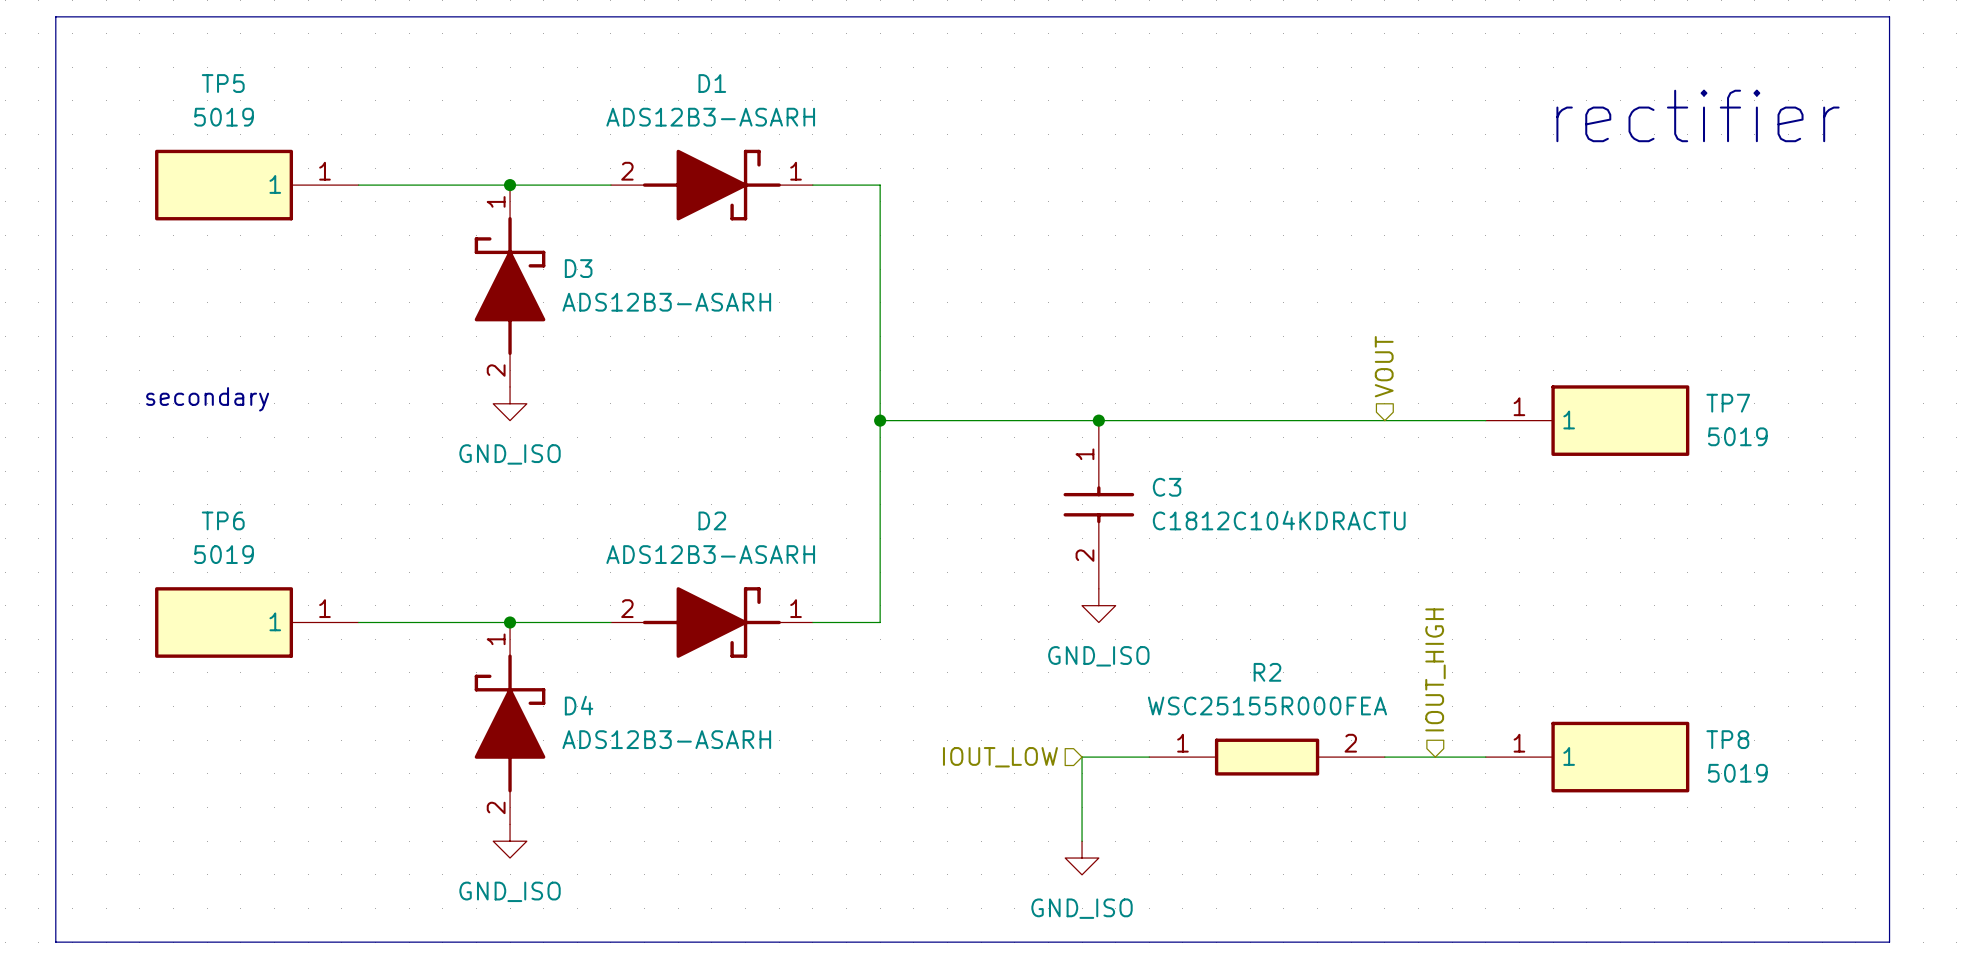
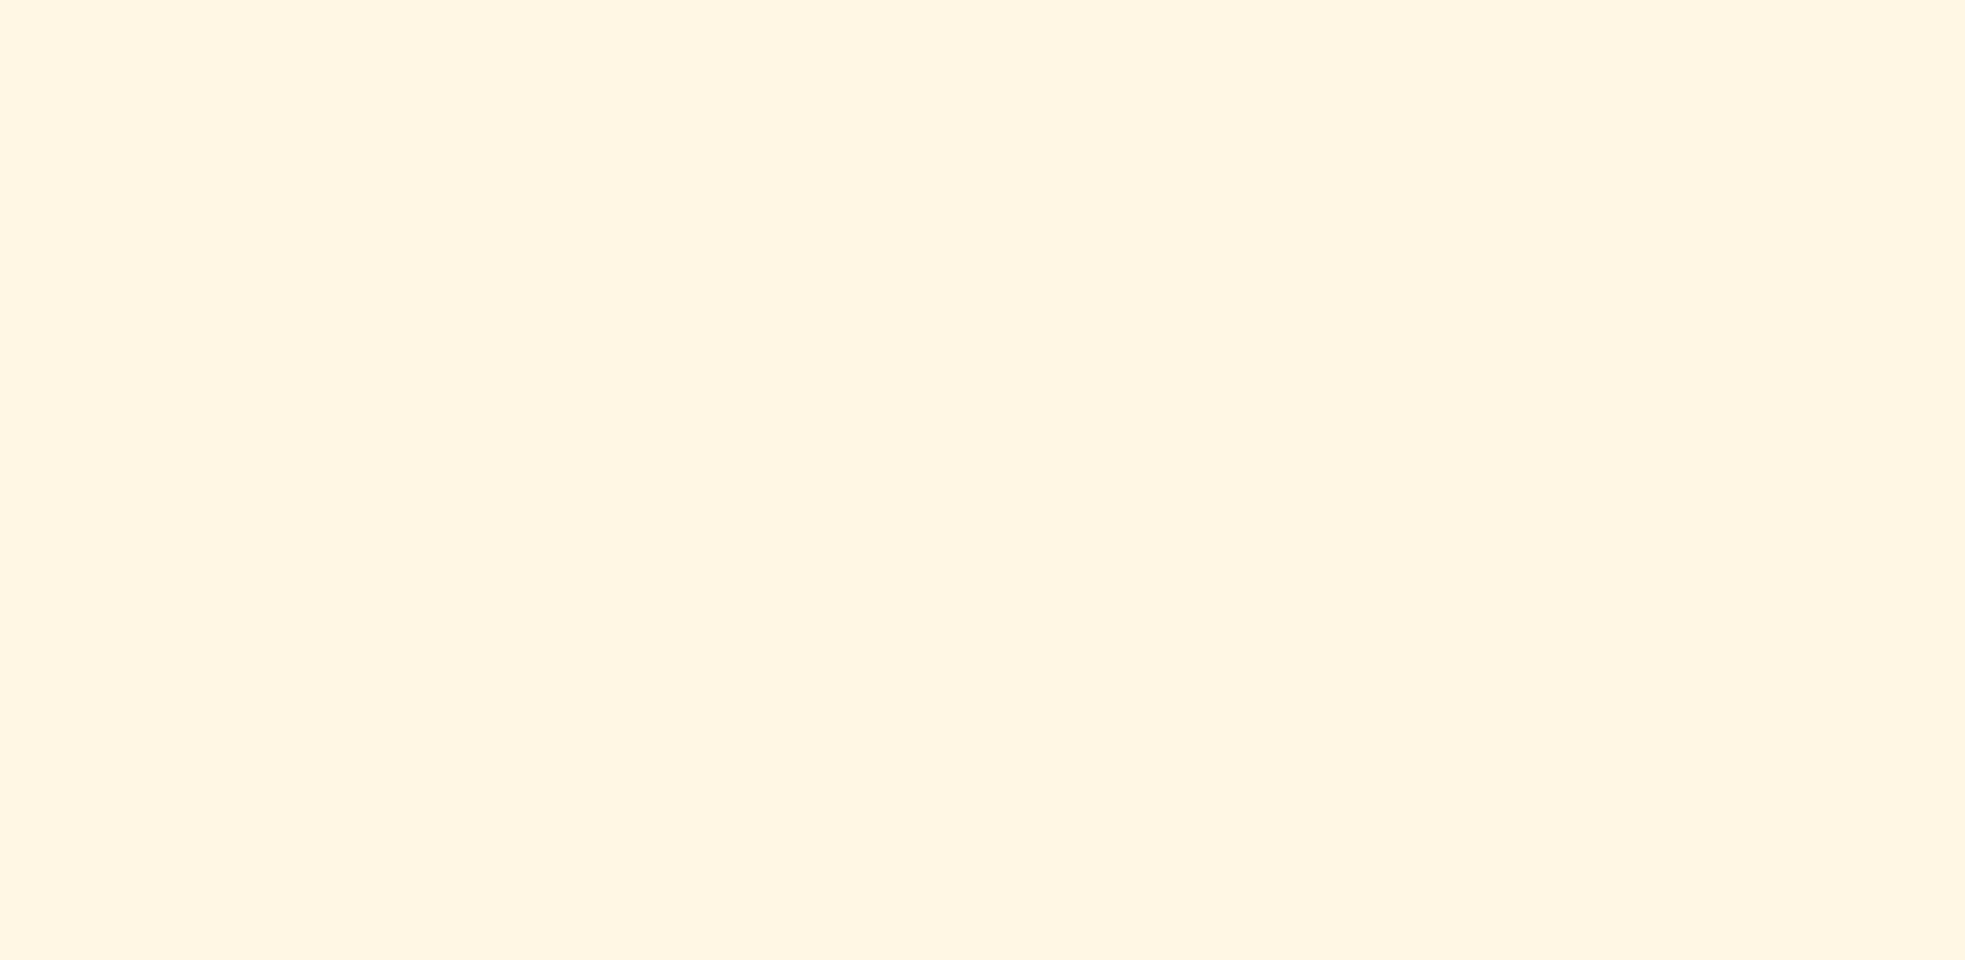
line: (55, 16) (1889, 16) (1889, 942) (55, 942) (55, 16) -> none
text: rectifier (1697, 115) -> none
TP5: 5019 (256, 185) -> none
wire: (358, 185) (610, 185) -> none
junction: (510, 185) -> none
D1: ADS12B3-ASARH (711, 185) -> none
wire: (812, 185) (880, 185) (880, 622) (812, 622) -> none
D3: ADS12B3-ASARH (510, 286) -> none
hierarchical label: VOUT (1384, 366) -> none
text: secondary (207, 399) -> none
power symbol: GND_ISO (510, 403) -> none
wire: (880, 420) (1485, 420) -> none
junction: (880, 420) -> none
junction: (1098, 420) -> none
TP7: 5019 (1587, 420) -> none
C3: C1812C104KDRACTU (1098, 504) -> none
power symbol: GND_ISO (1098, 605) -> none
TP6: 5019 (256, 622) -> none
wire: (358, 622) (610, 622) -> none
junction: (510, 622) -> none
D2: ADS12B3-ASARH (711, 622) -> none
hierarchical label: IOUT_HIGH (1435, 669) -> none
D4: ADS12B3-ASARH (510, 723) -> none
hierarchical label: IOUT_LOW (1000, 757) -> none
wire: (1149, 757) (1082, 757) (1082, 841) -> none
R2: WSC25155R000FEA (1267, 757) -> none
wire: (1384, 757) (1485, 757) -> none
TP8: 5019 (1587, 757) -> none
power symbol: GND_ISO (510, 841) -> none
power symbol: GND_ISO (1082, 858) -> none

